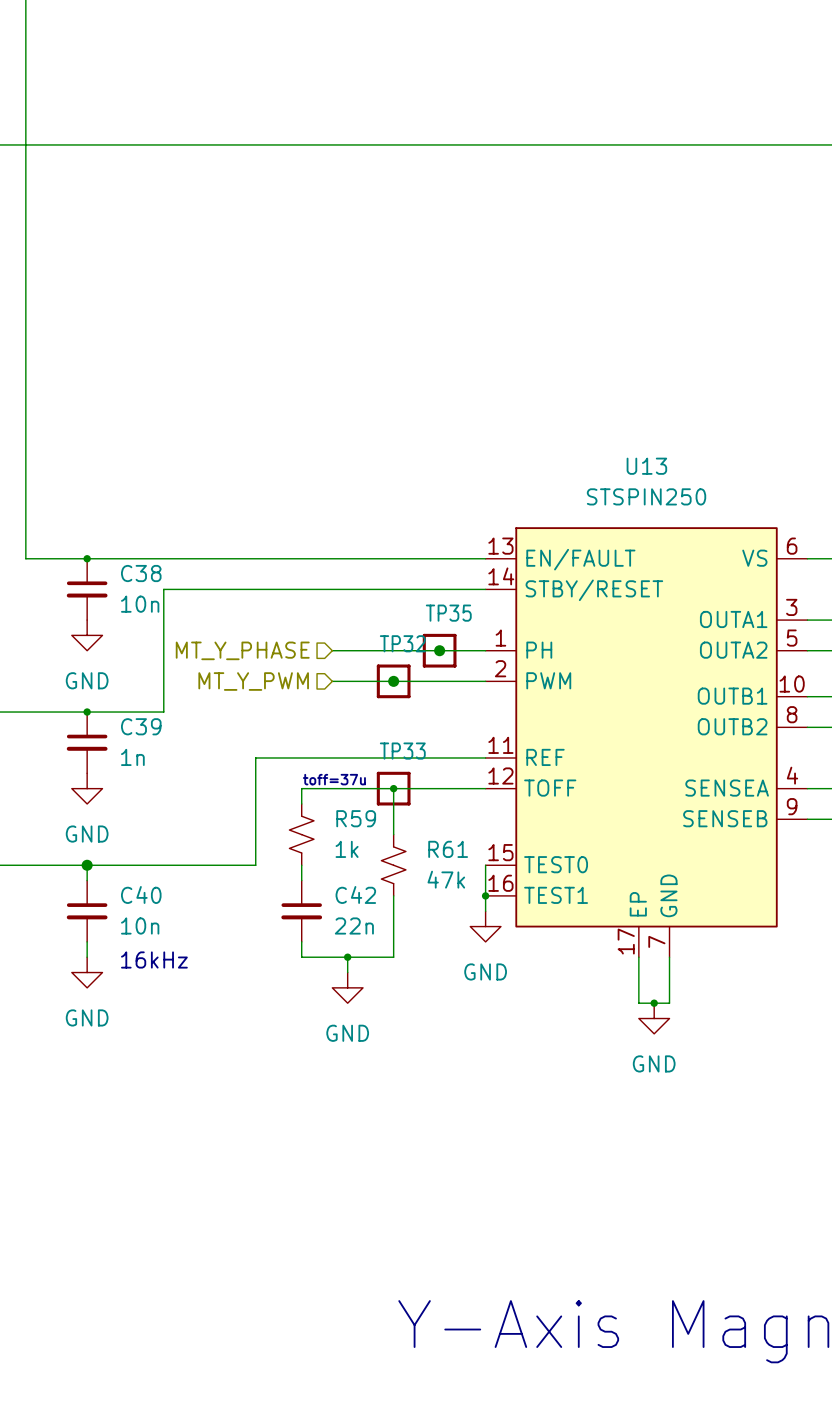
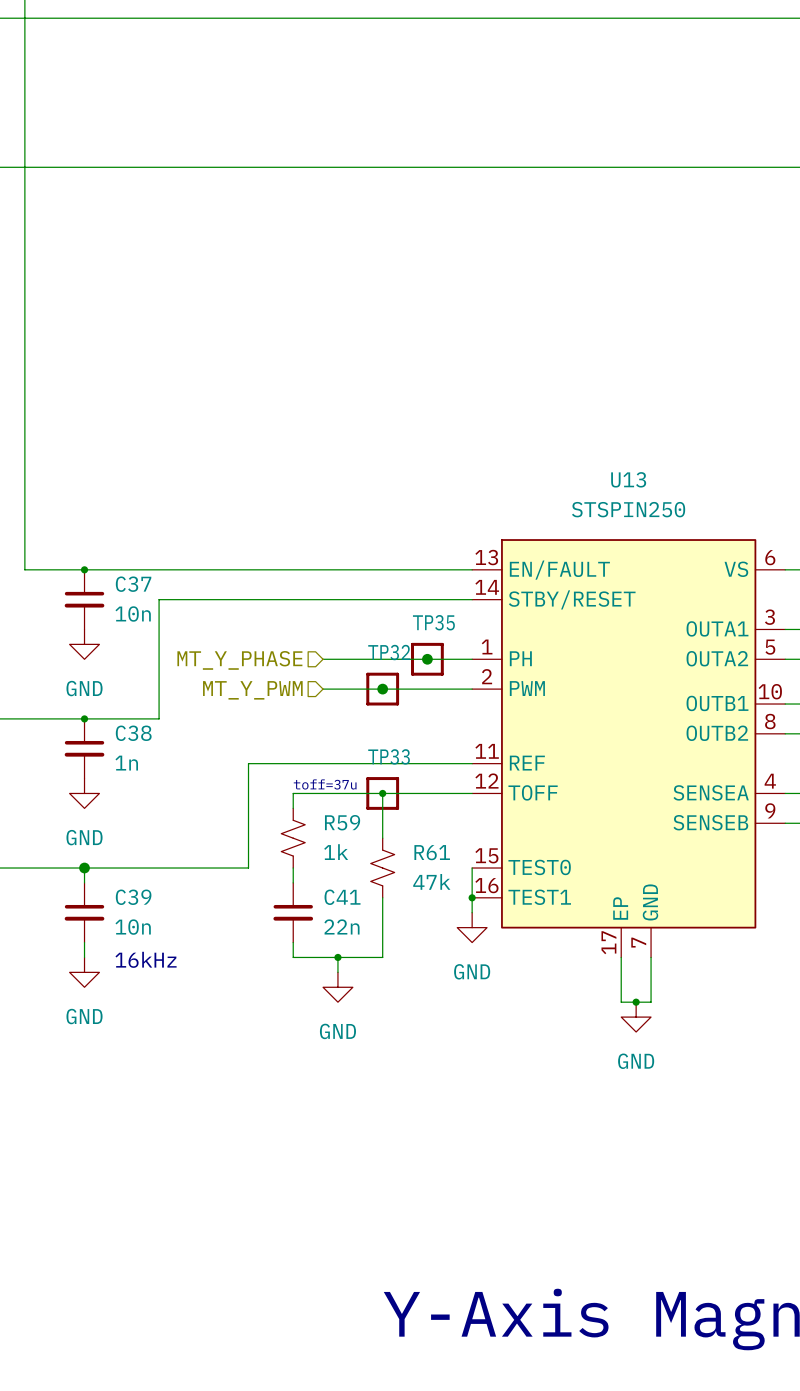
C38 name: C38 (141, 573) -> C37 (133, 584)
C39 name: C39 (141, 726) -> C38 (133, 733)
C40 name: C40 (141, 894) -> C39 (133, 897)
C42 name: C42 (355, 894) -> C41 (342, 897)

